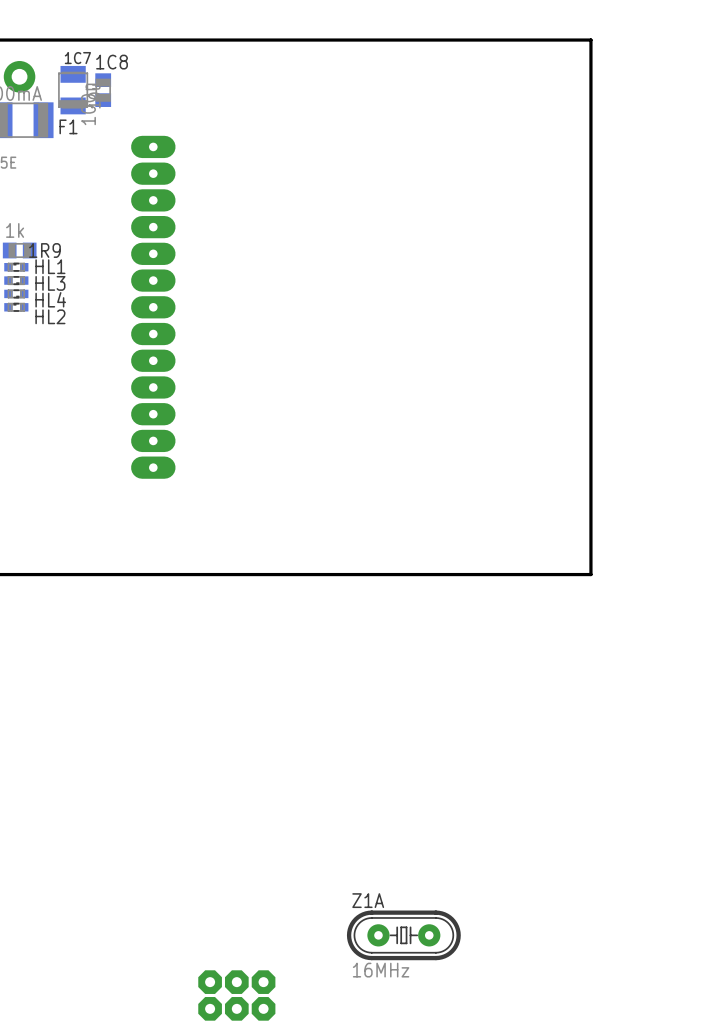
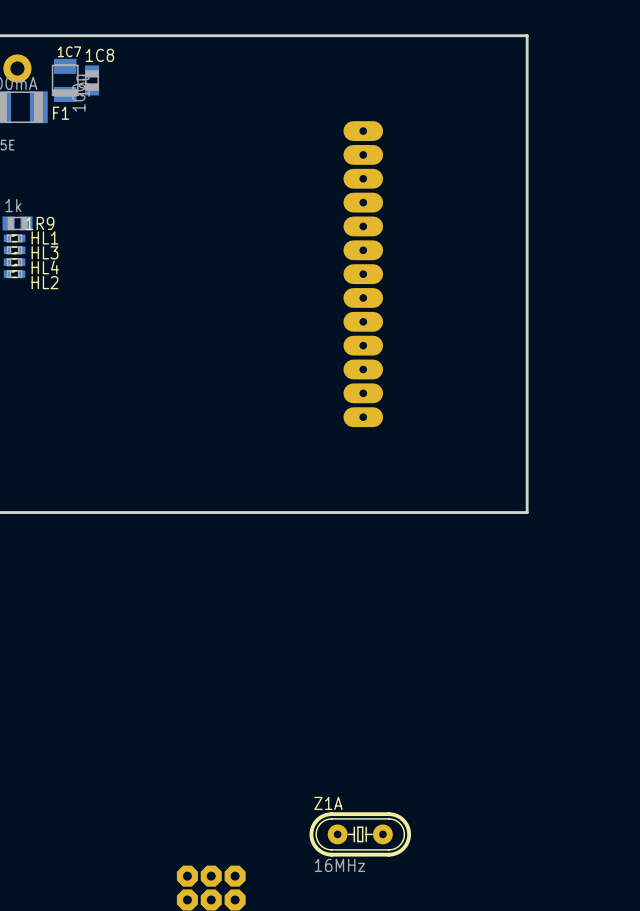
part position: (153, 307) -> (363, 274)

